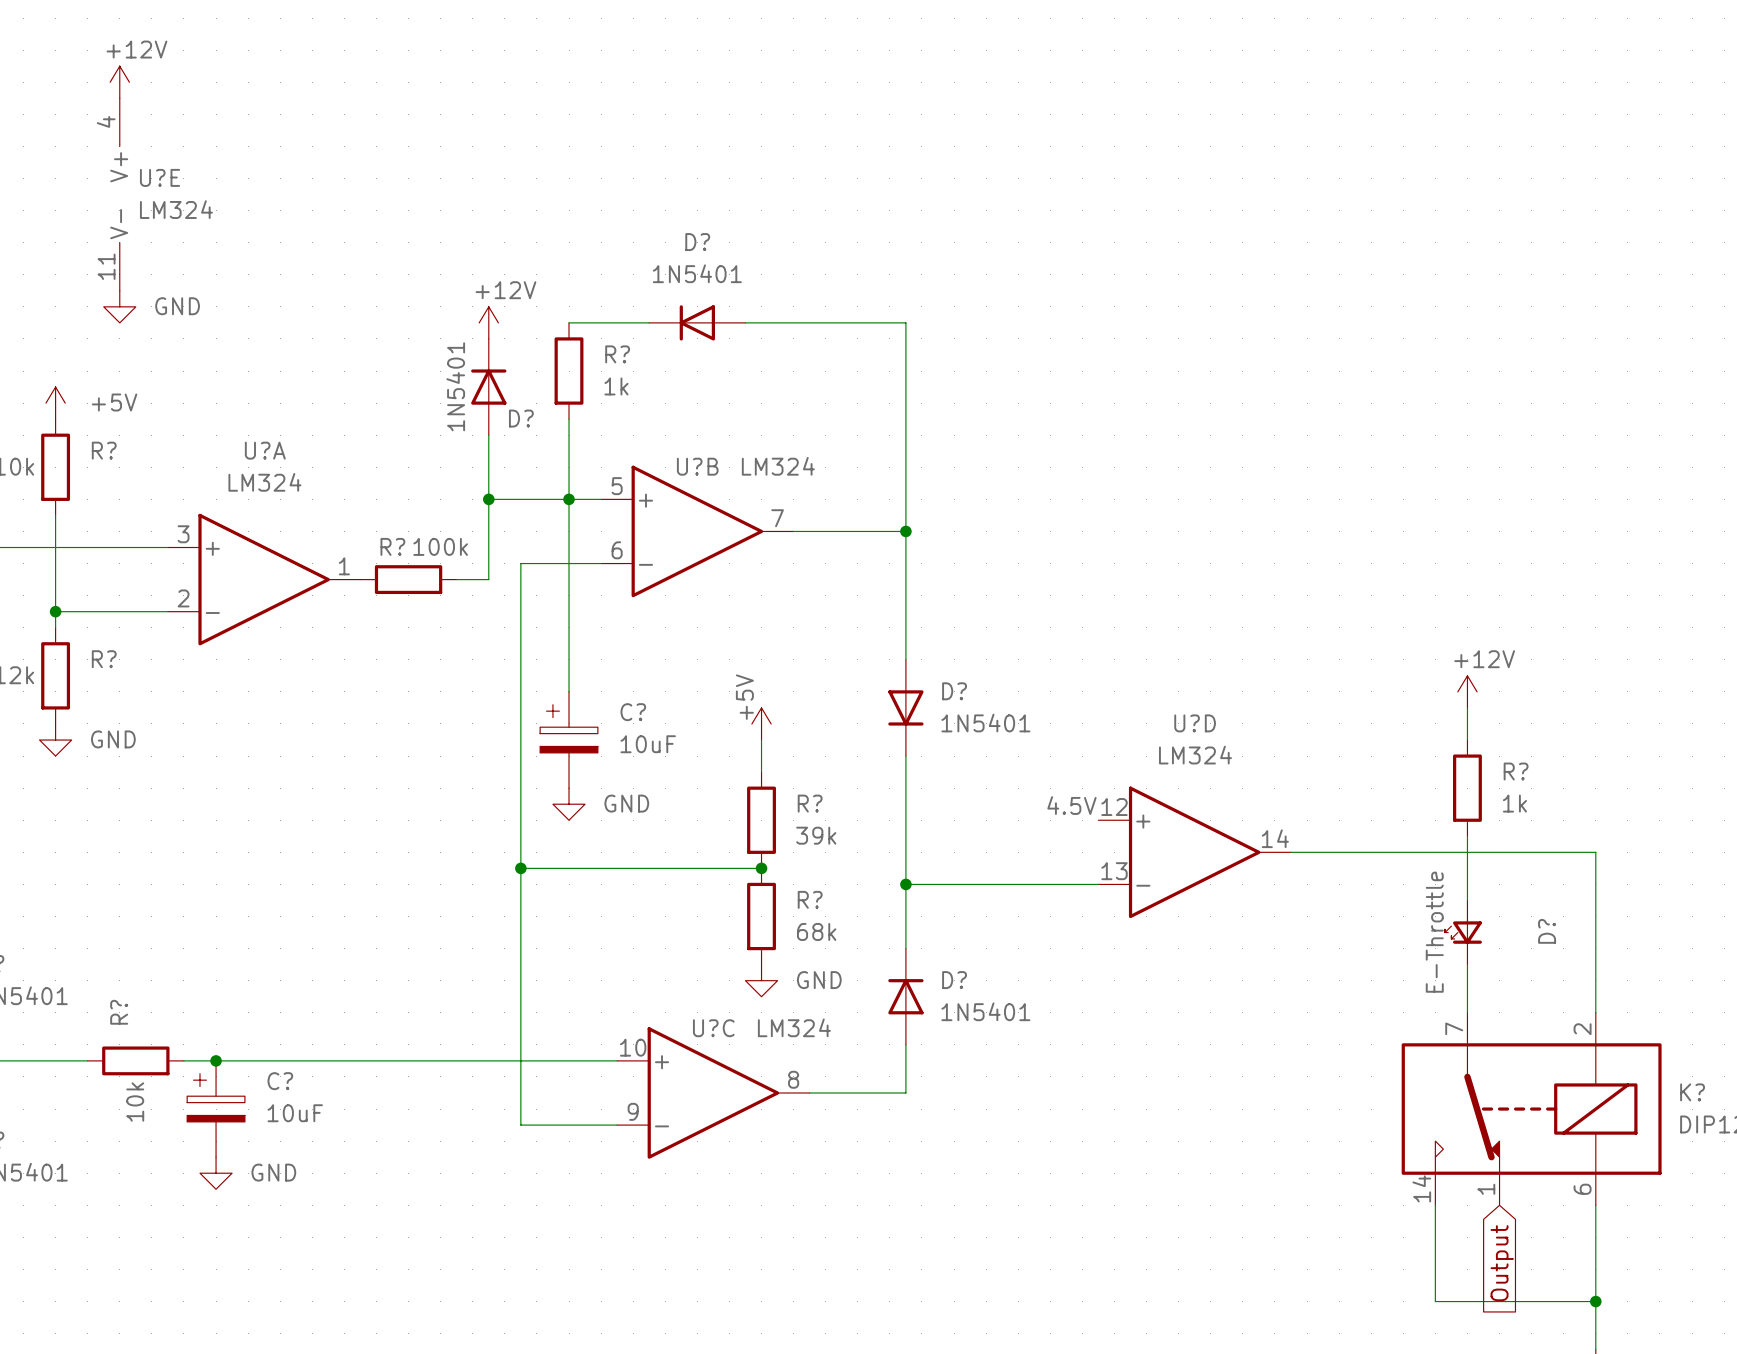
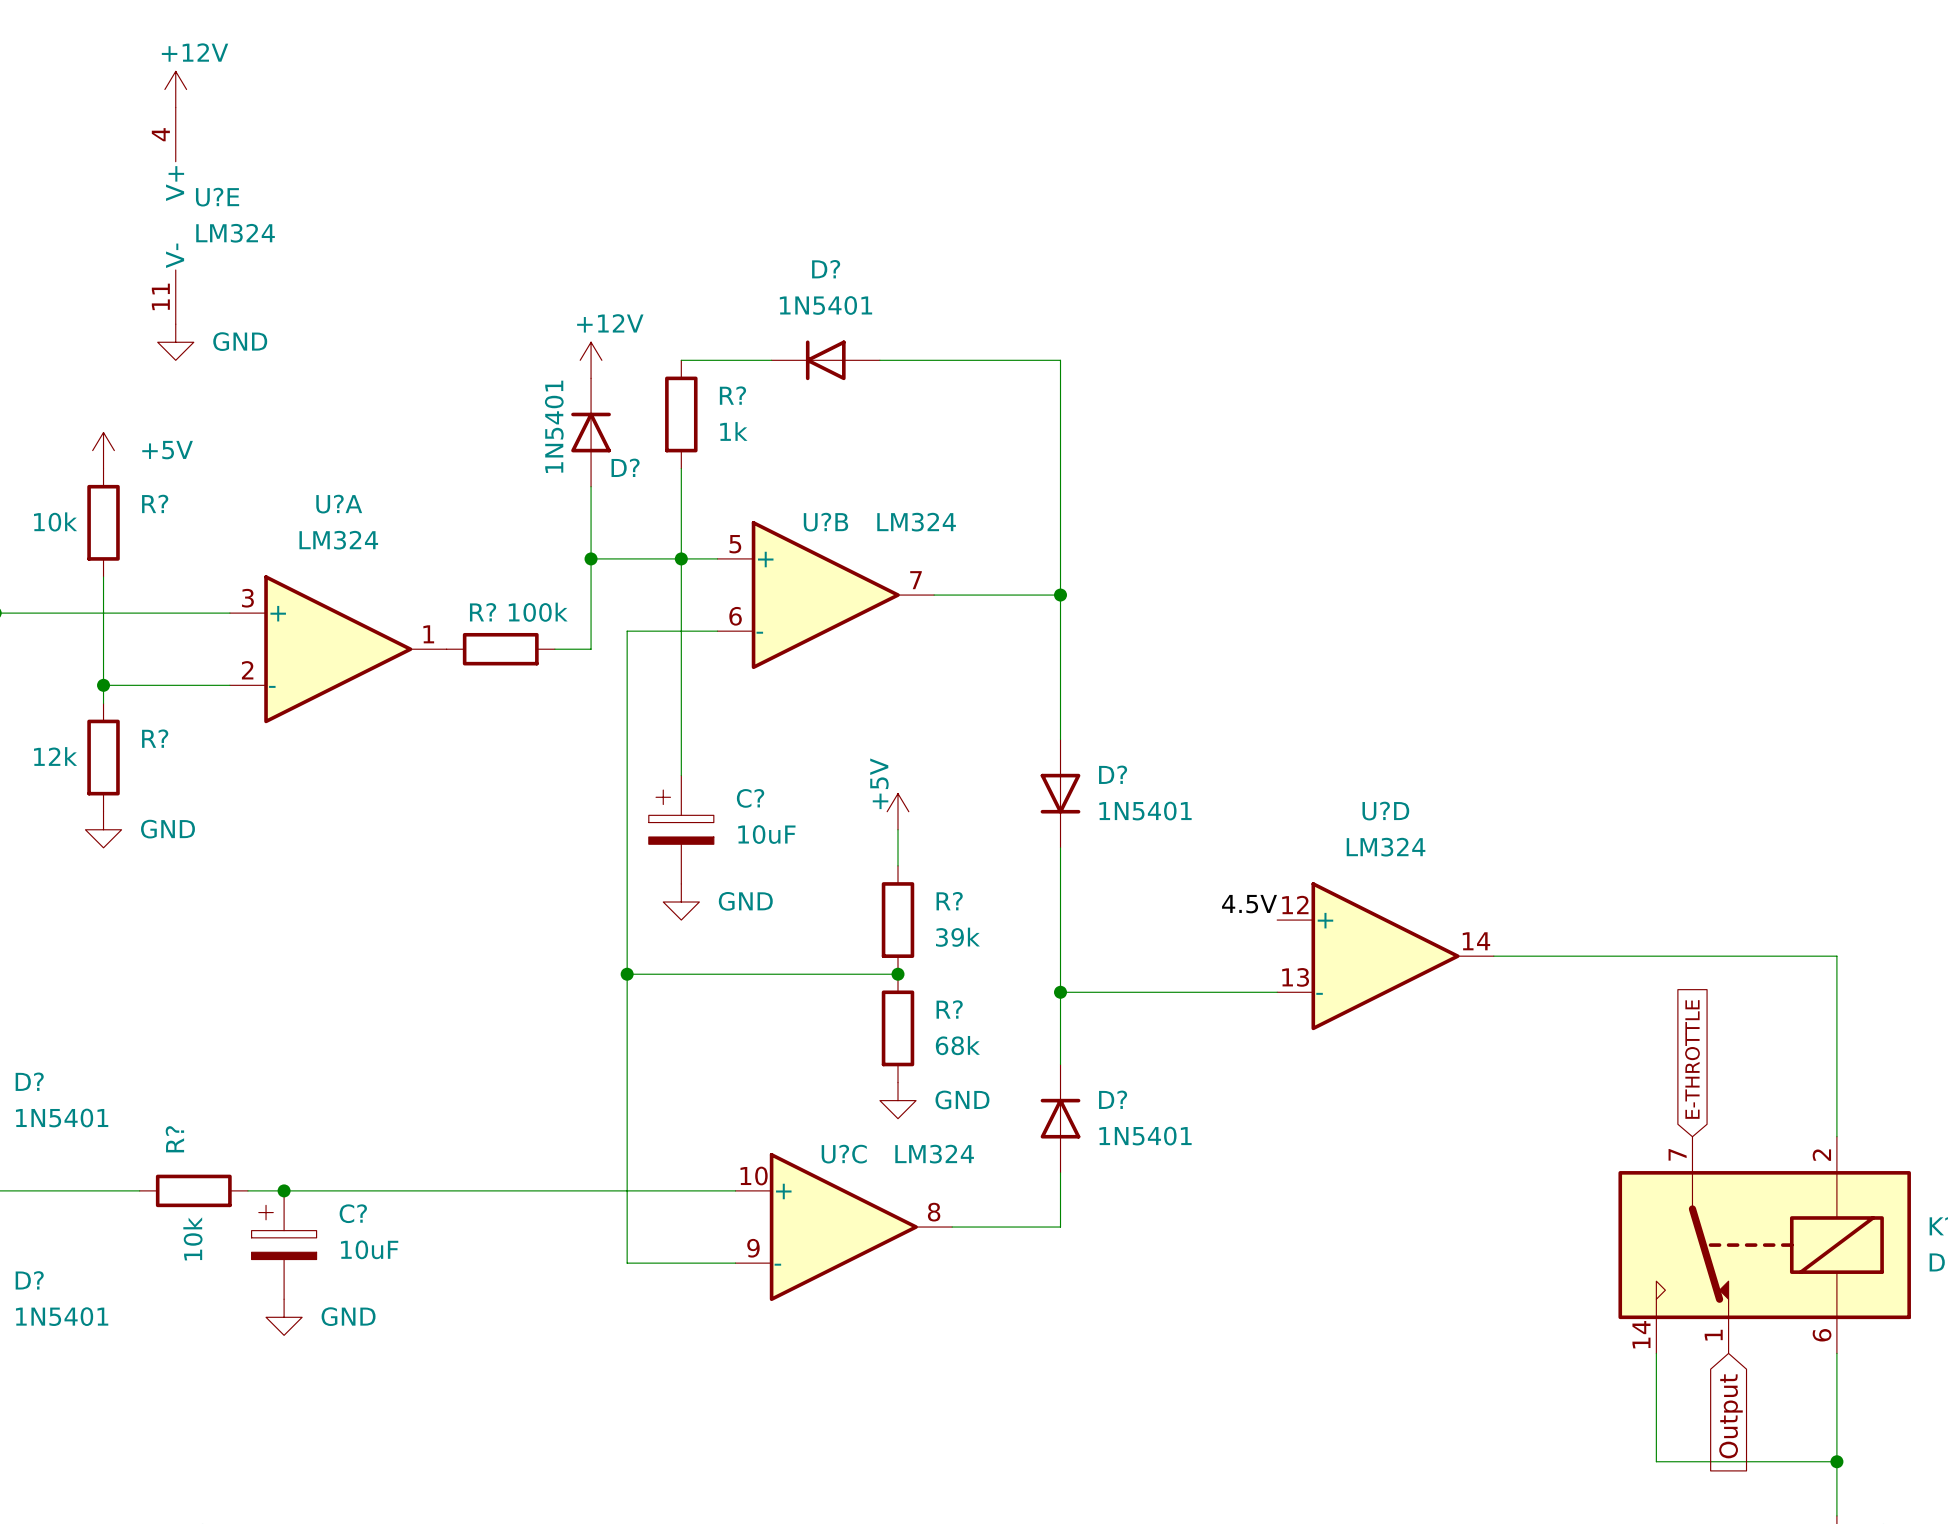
power symbol: +12V (1467, 691) -> none
wire: (1467, 707) (1467, 740) -> none
R?: 1k (1467, 788) -> none
wire: (1467, 836) (1467, 900) -> none
D?: E-Throttle (1463, 932) -> none
global label: none -> E-THROTTLE (1692, 1059)
wire: (1467, 964) (1467, 1012) -> none

